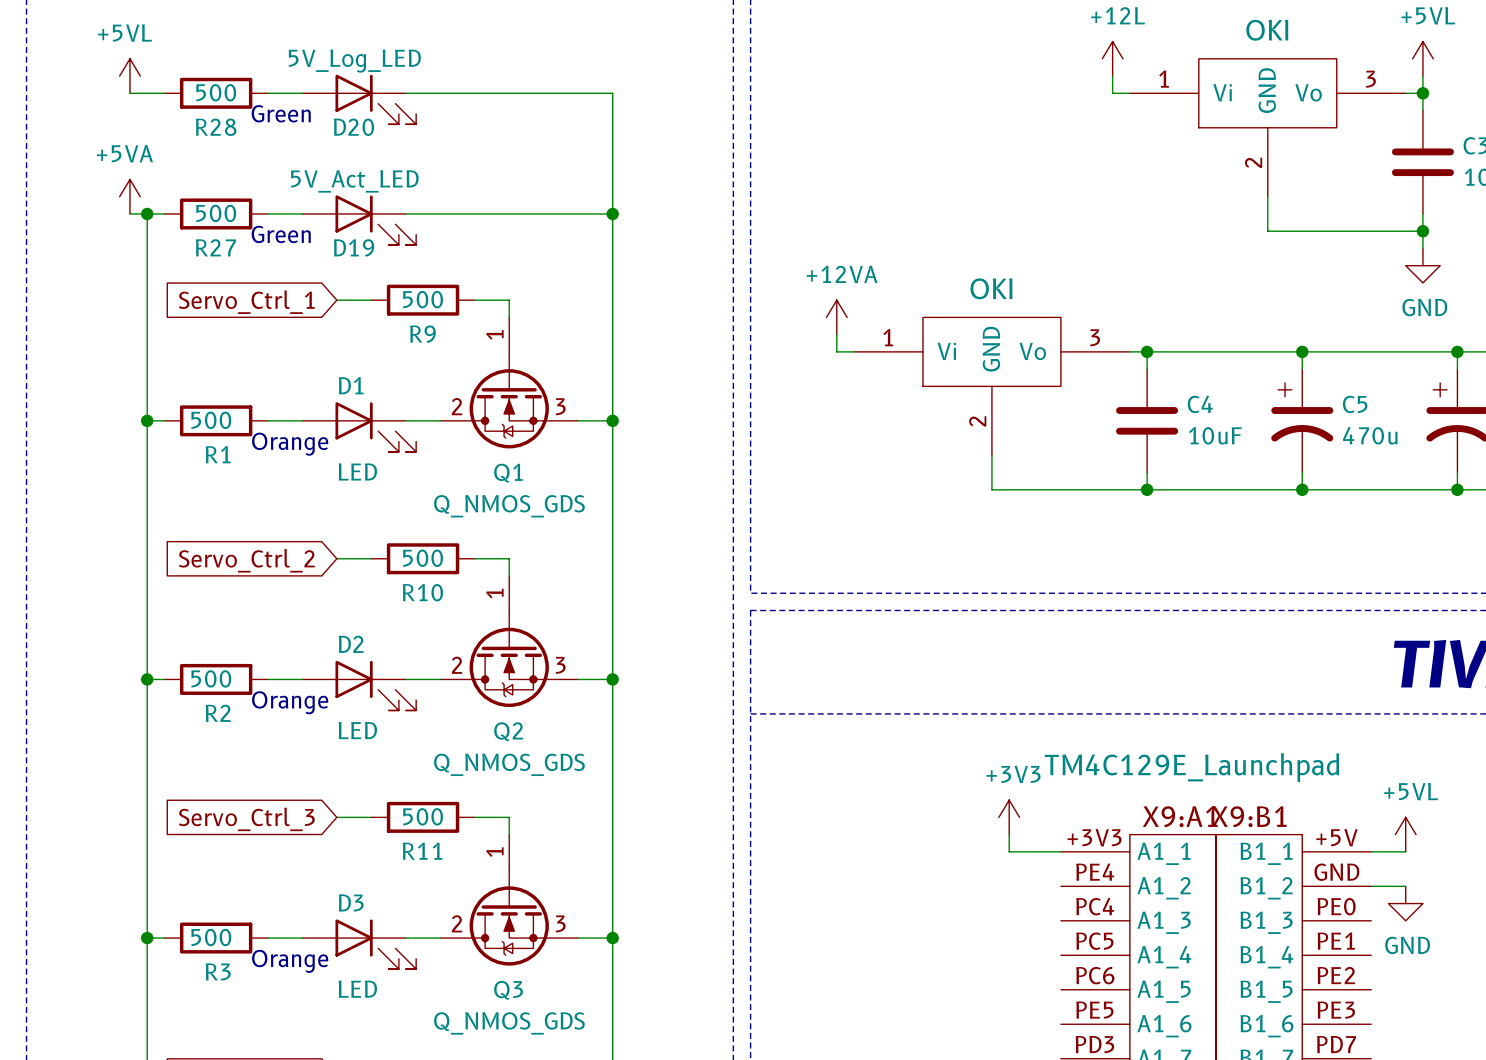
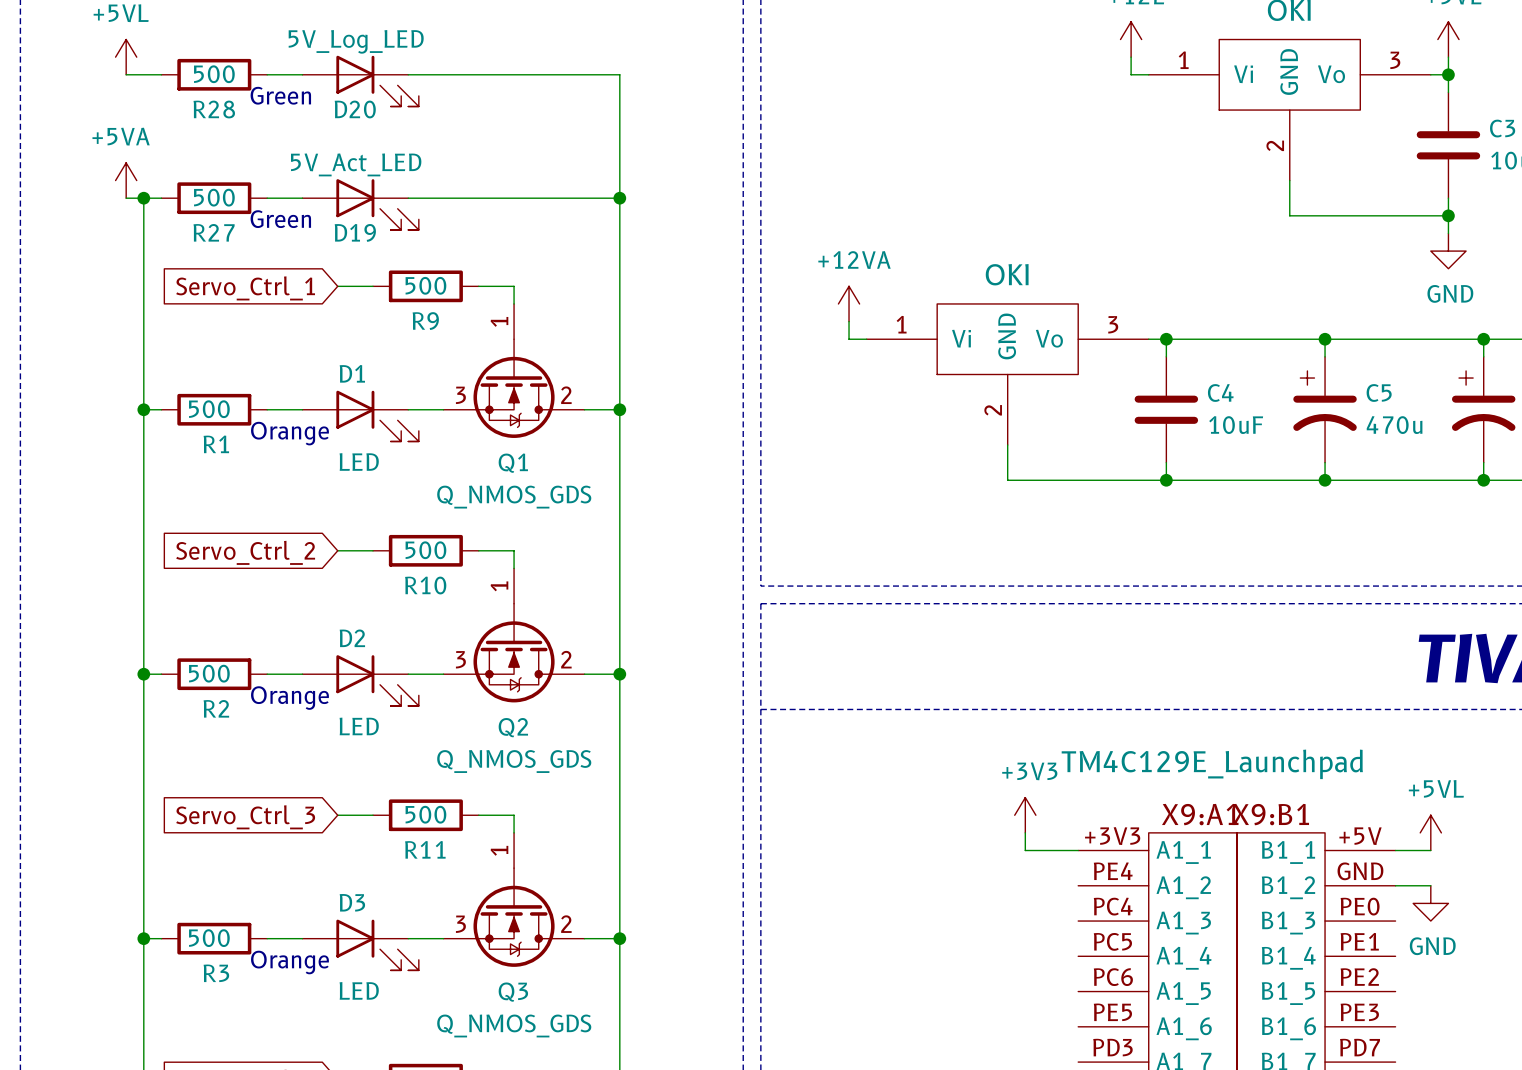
Q1 flip: as is (509, 400) -> left-right (514, 388)
Q2 flip: as is (509, 658) -> left-right (514, 653)
Q3 flip: as is (509, 917) -> left-right (514, 917)

